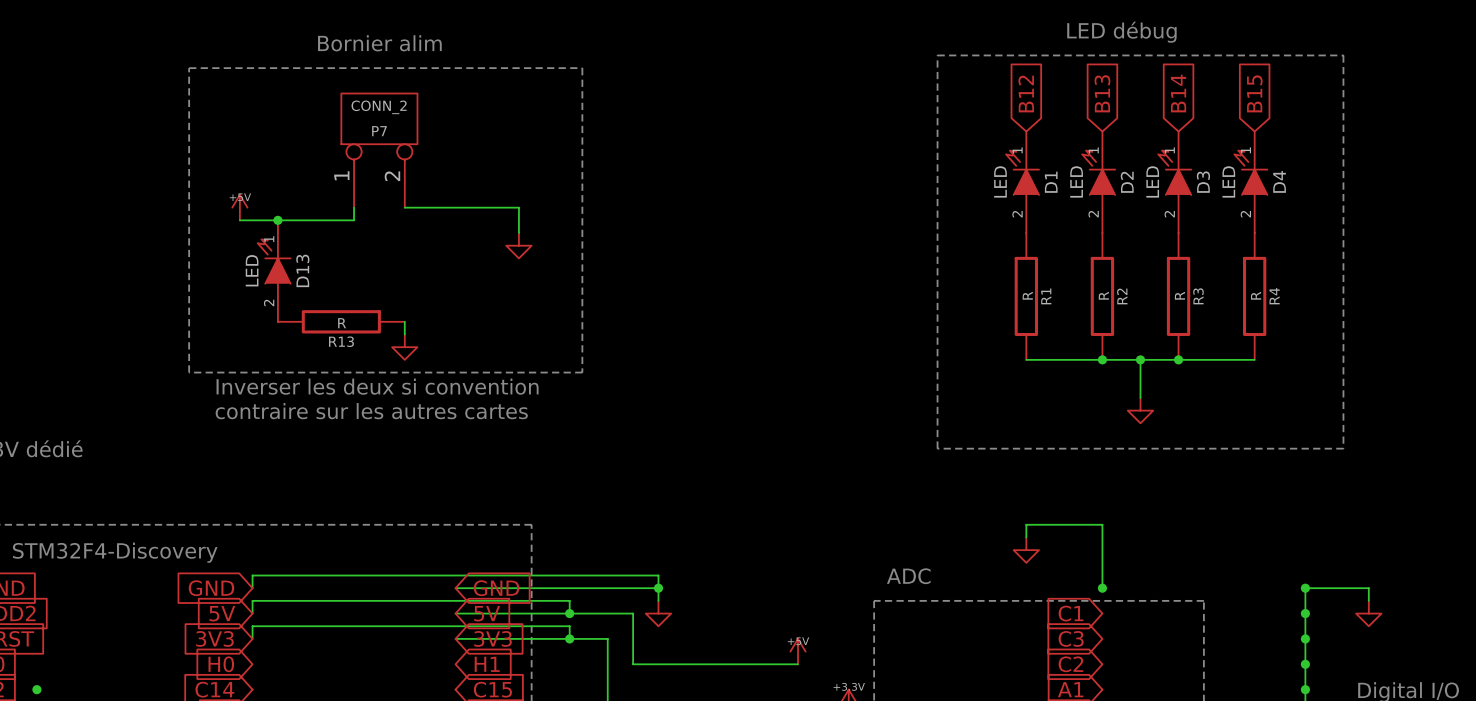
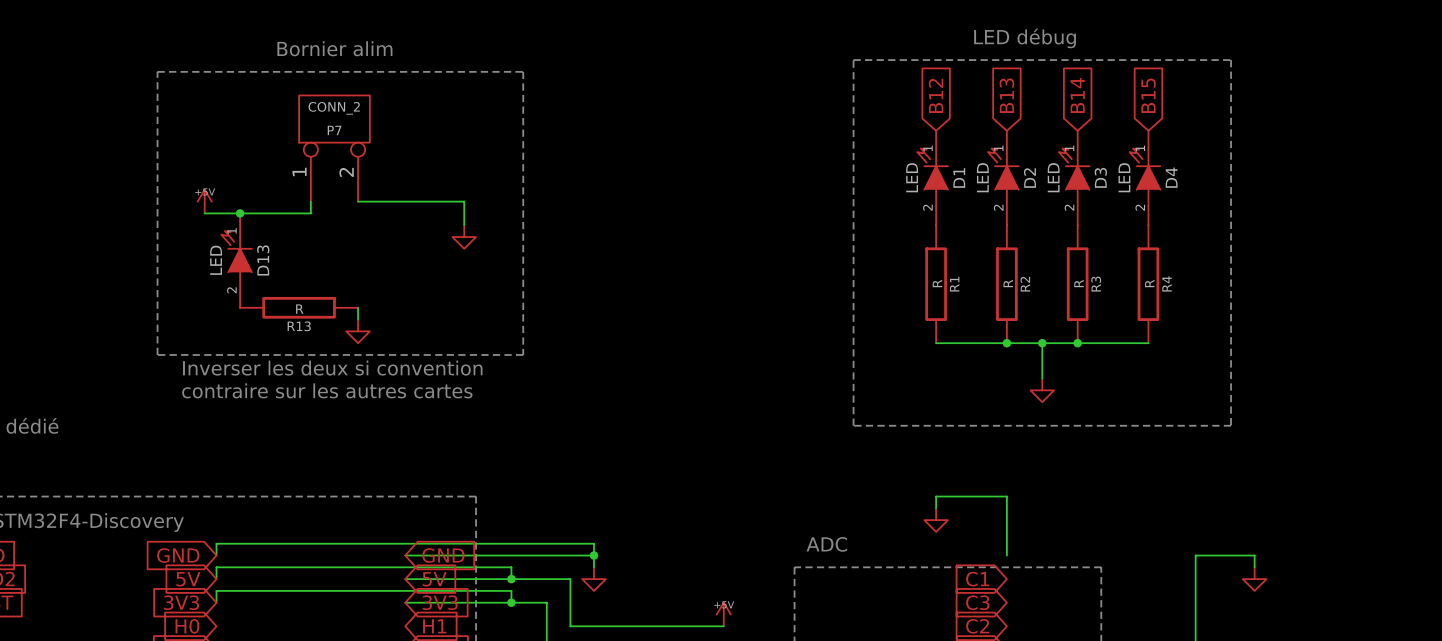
junction: (1102, 588) -> none
junction: (1305, 588) -> none
junction: (1305, 613) -> none
junction: (1305, 638) -> none
junction: (1305, 664) -> none

